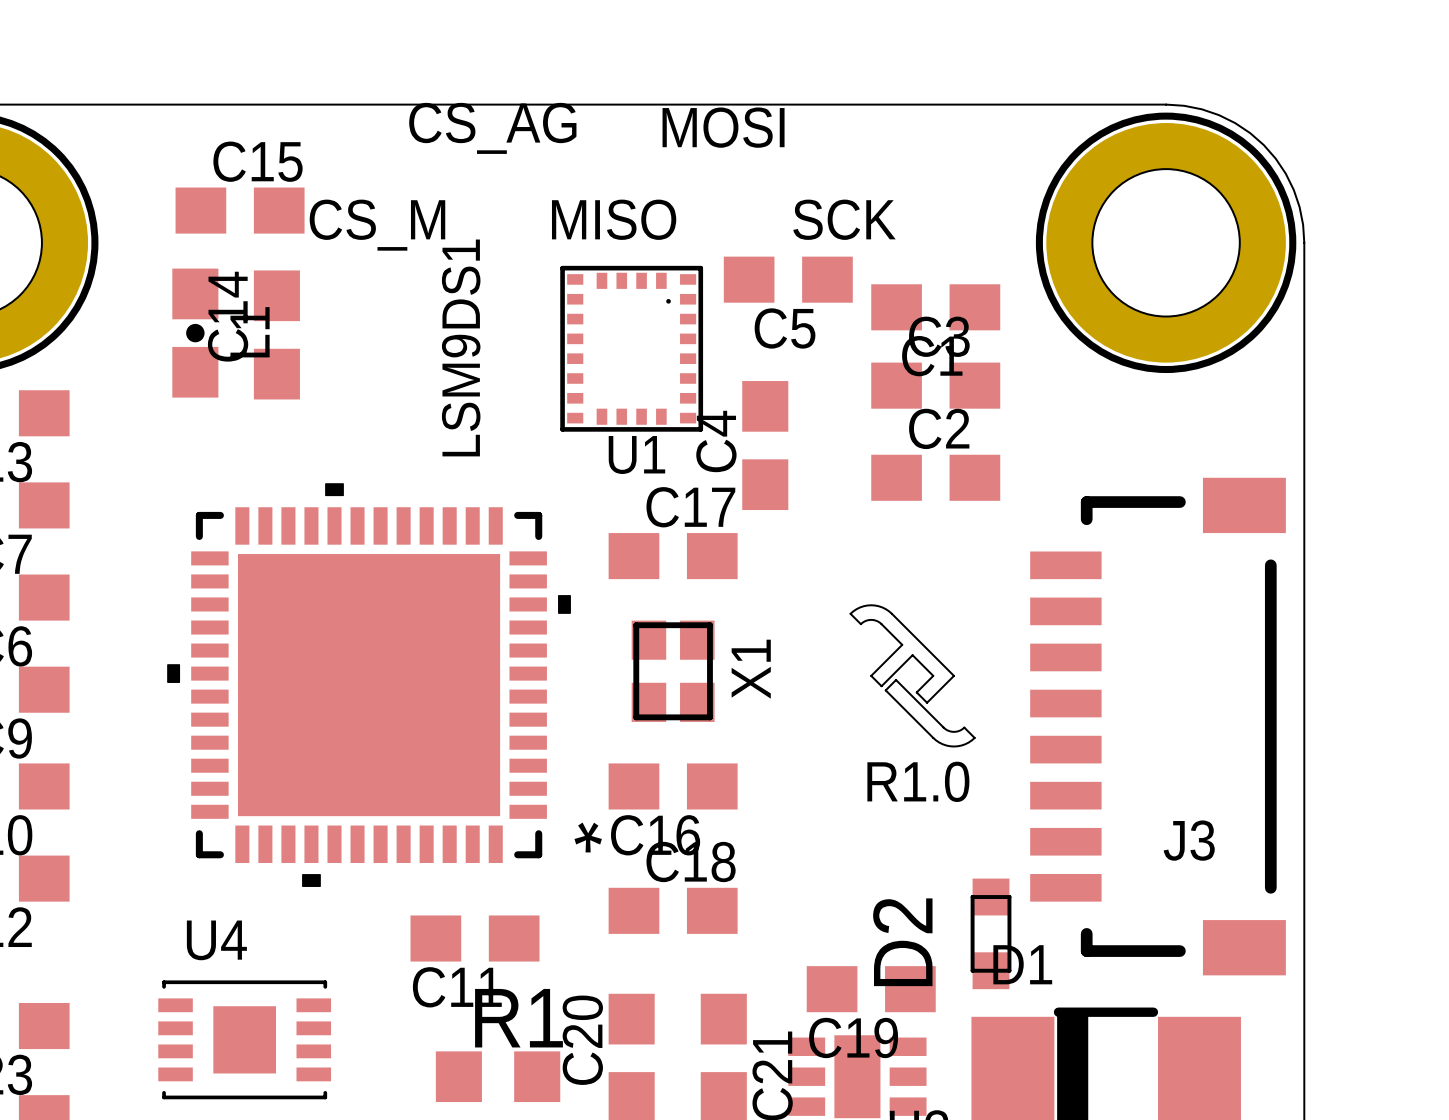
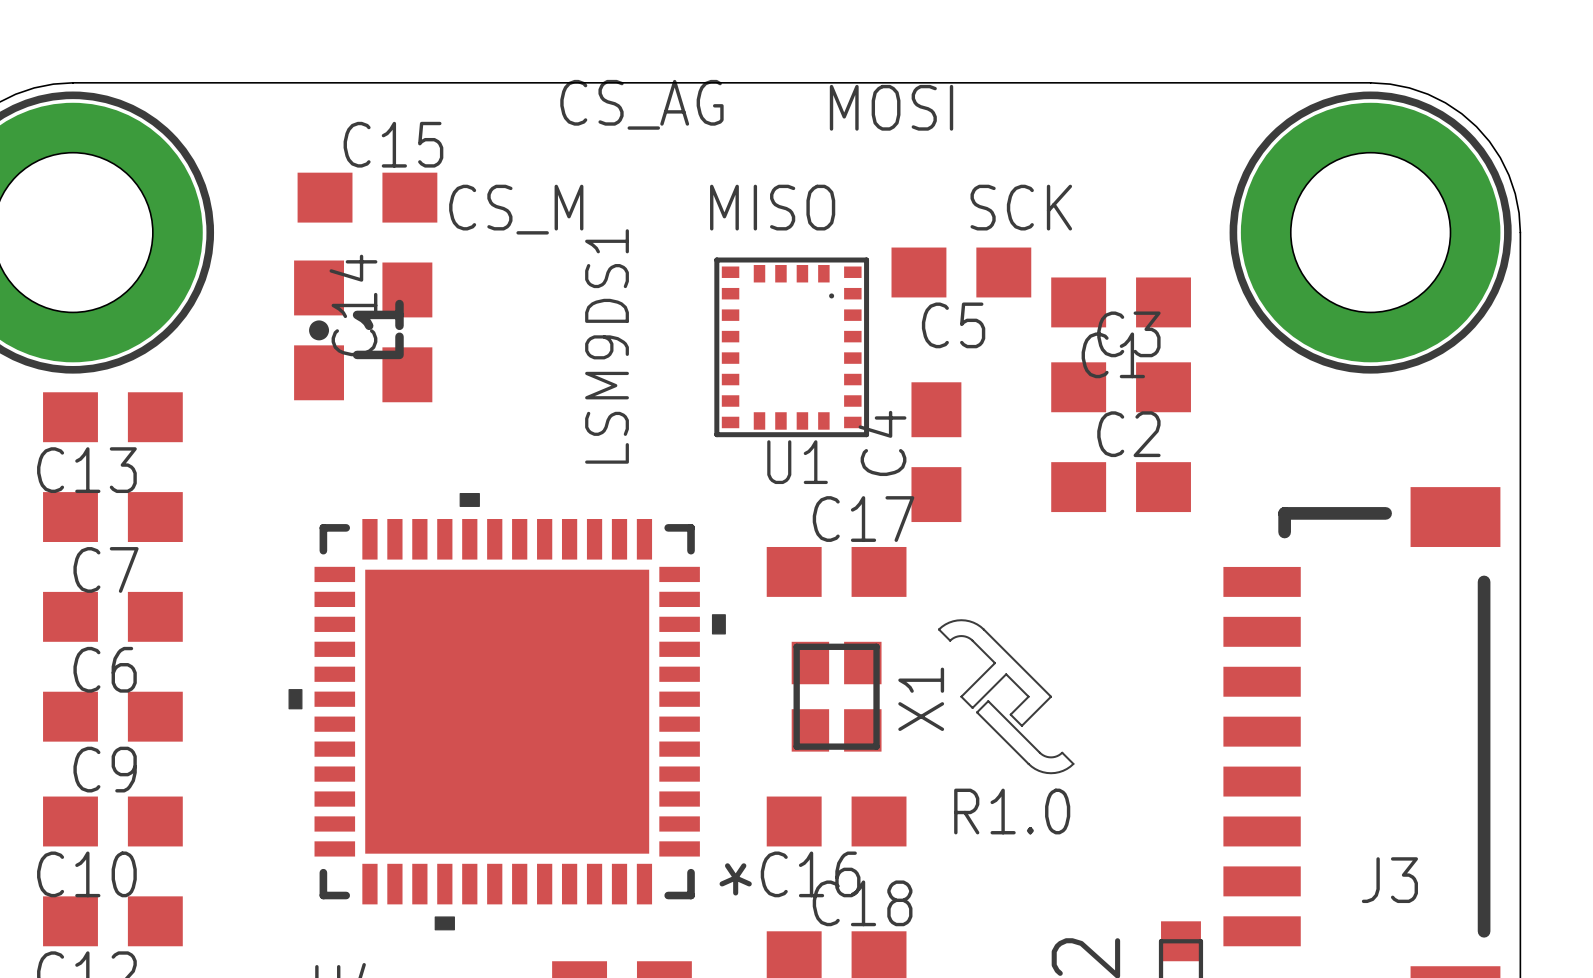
line: (850, 613) (860, 624) (869, 619) (879, 622) (902, 644) (871, 675) (881, 686) (912, 655) (933, 675) (916, 692) (927, 702) (953, 675) (885, 609) (867, 605) (850, 613) -> (938, 629) (950, 640) (959, 636) (969, 638) (994, 663) (961, 696) (972, 707) (1006, 674) (1028, 696) (1010, 714) (1021, 725) (1051, 696) (977, 624) (965, 620) (957, 620) (945, 624) (938, 629)
line: (896, 680) (885, 690) (936, 740) (946, 745) (957, 746) (974, 737) (964, 727) (955, 731) (945, 728) (896, 680) -> (988, 701) (977, 712) (1031, 766) (1042, 772) (1055, 772) (1063, 770) (1073, 763) (1062, 752) (1053, 757) (1041, 754) (988, 701)
text position: R1.0 (918, 781) -> R1.0 (1012, 811)

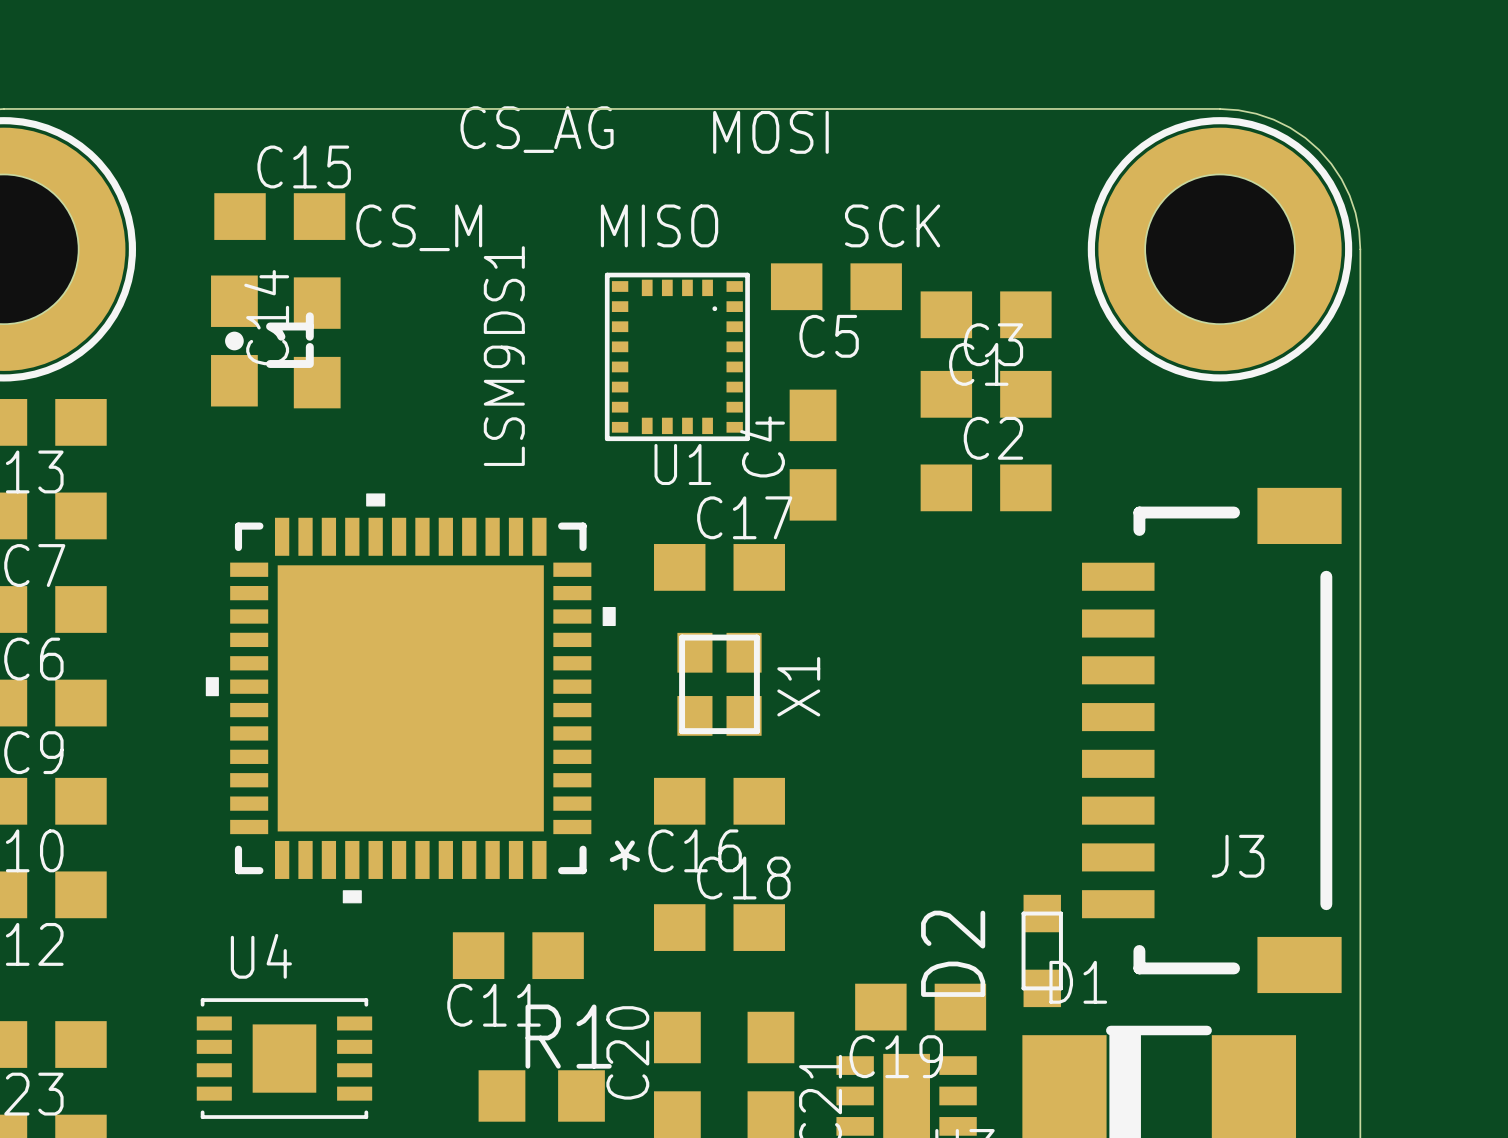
line: (938, 629) (950, 640) (959, 636) (969, 638) (994, 663) (961, 696) (972, 707) (1006, 674) (1028, 696) (1010, 714) (1021, 725) (1051, 696) (977, 624) (965, 620) (957, 620) (945, 624) (938, 629) -> none
line: (988, 701) (977, 712) (1031, 766) (1042, 772) (1055, 772) (1063, 770) (1073, 763) (1062, 752) (1053, 757) (1041, 754) (988, 701) -> none
text: R1.0 (1012, 811) -> none

